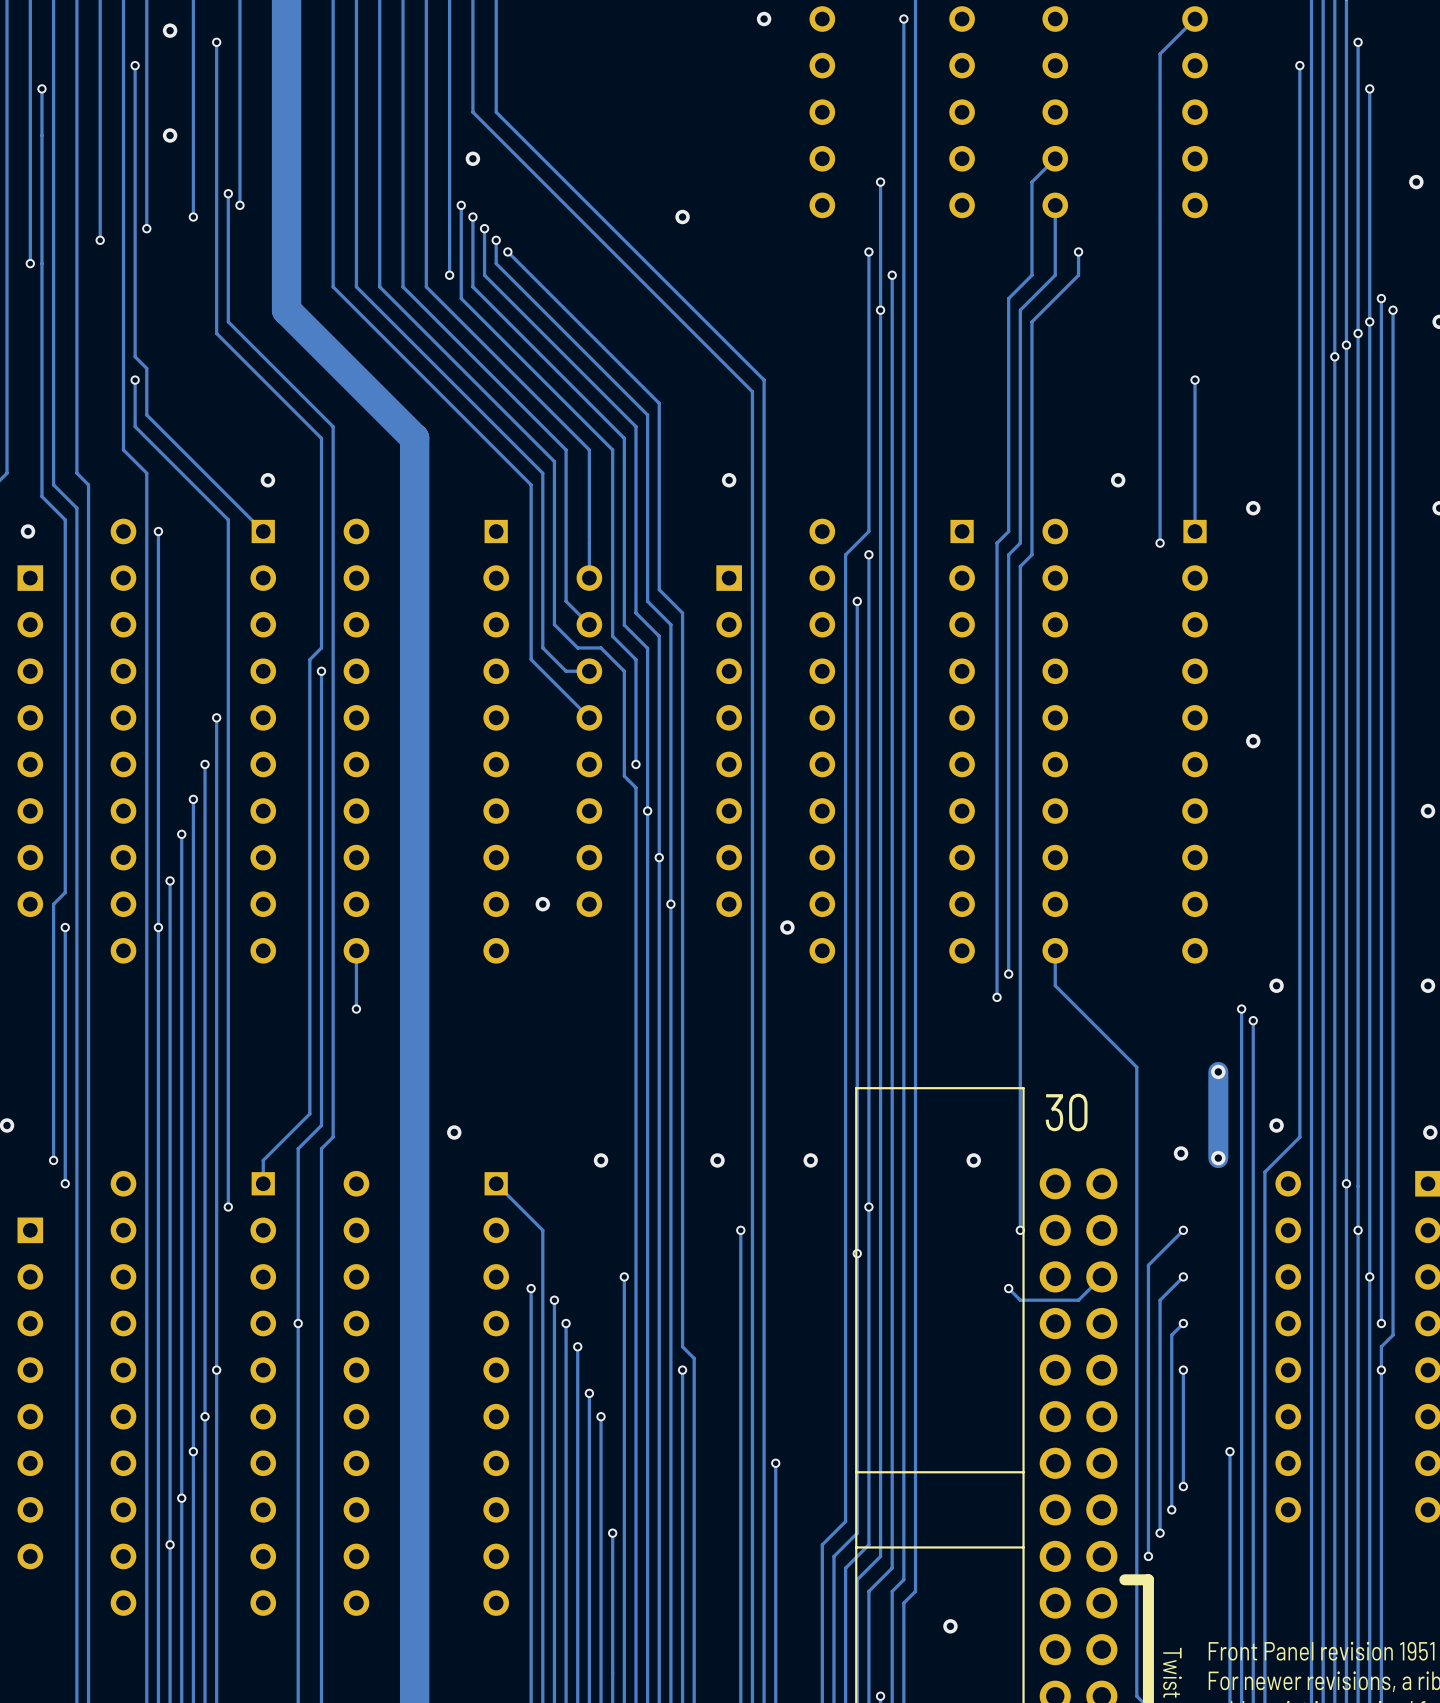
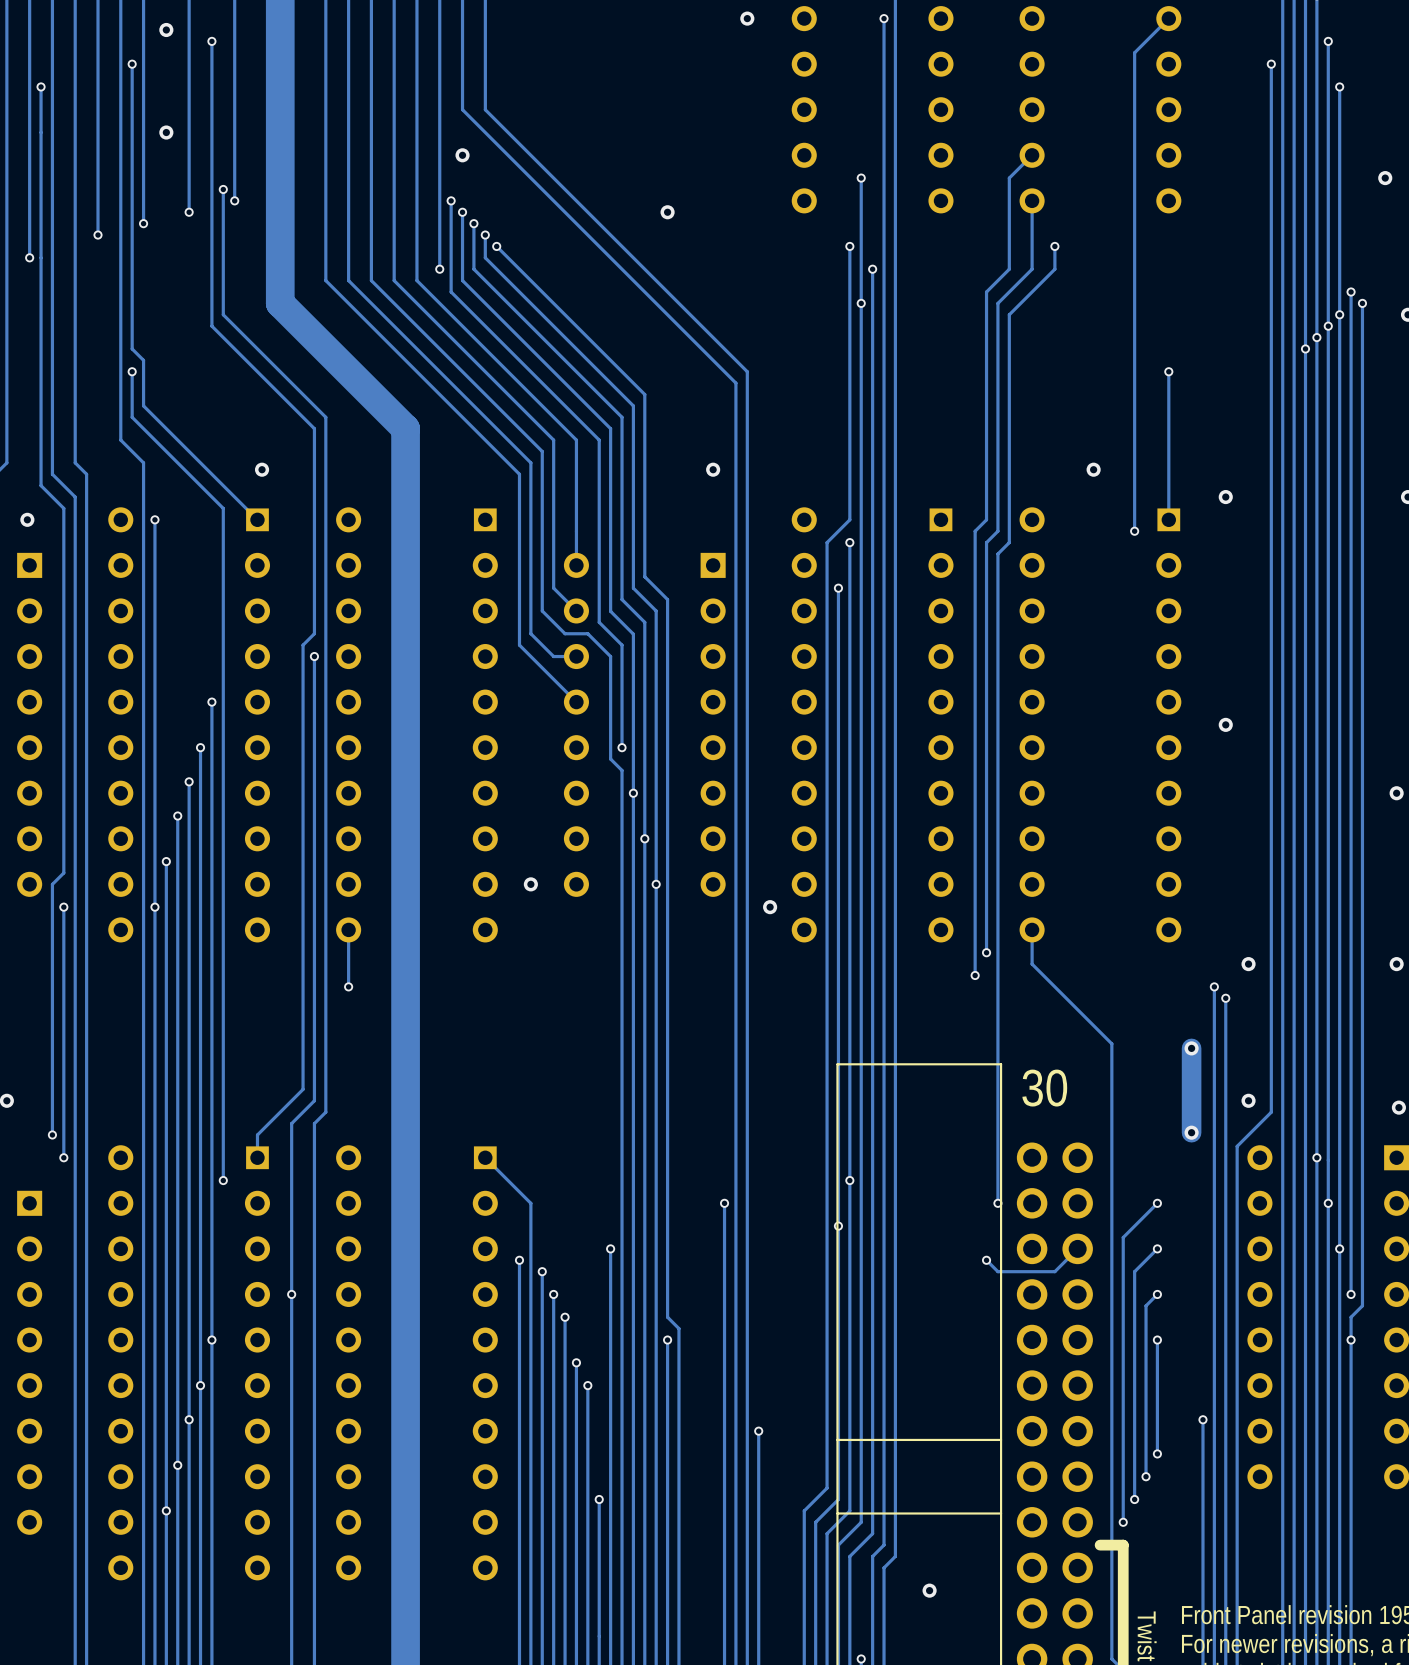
via: (454, 1132) -> none
via: (1181, 1153) -> none
via: (601, 1160) -> none
via: (717, 1160) -> none
via: (810, 1160) -> none
via: (973, 1160) -> none

